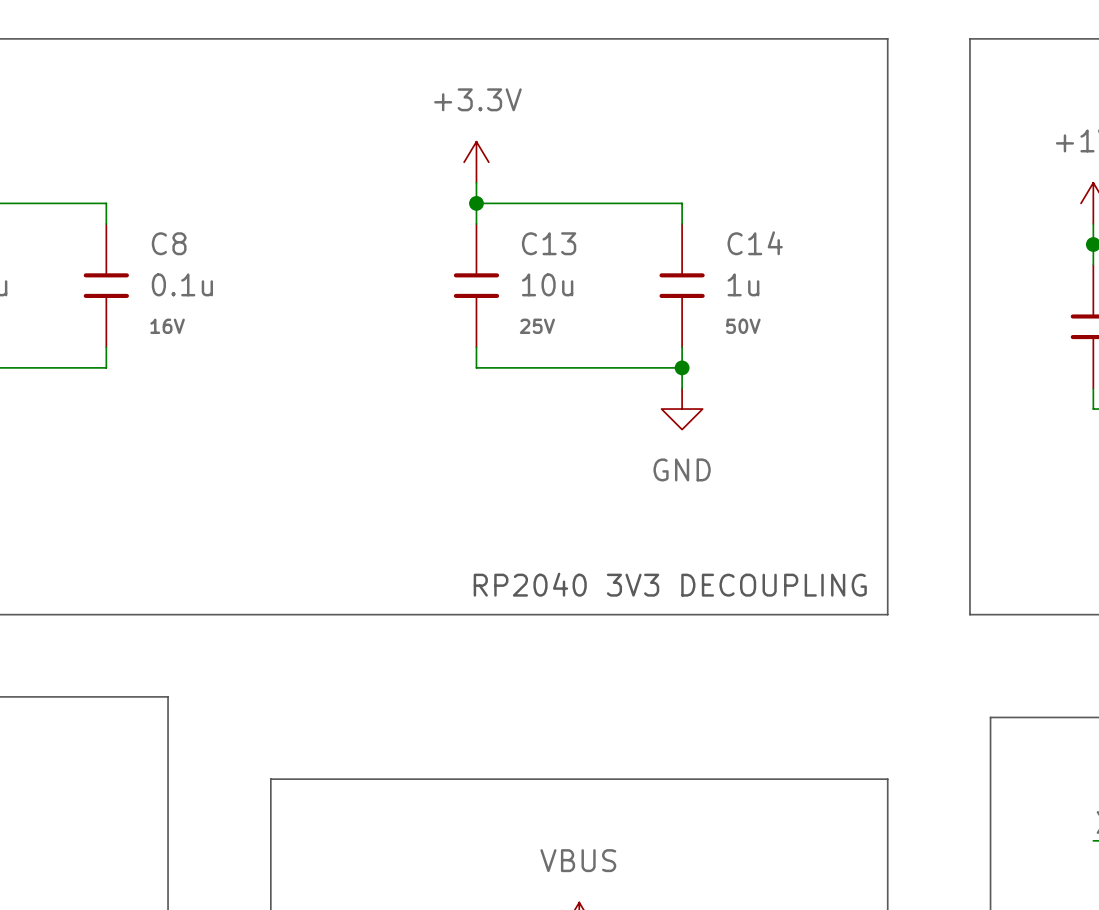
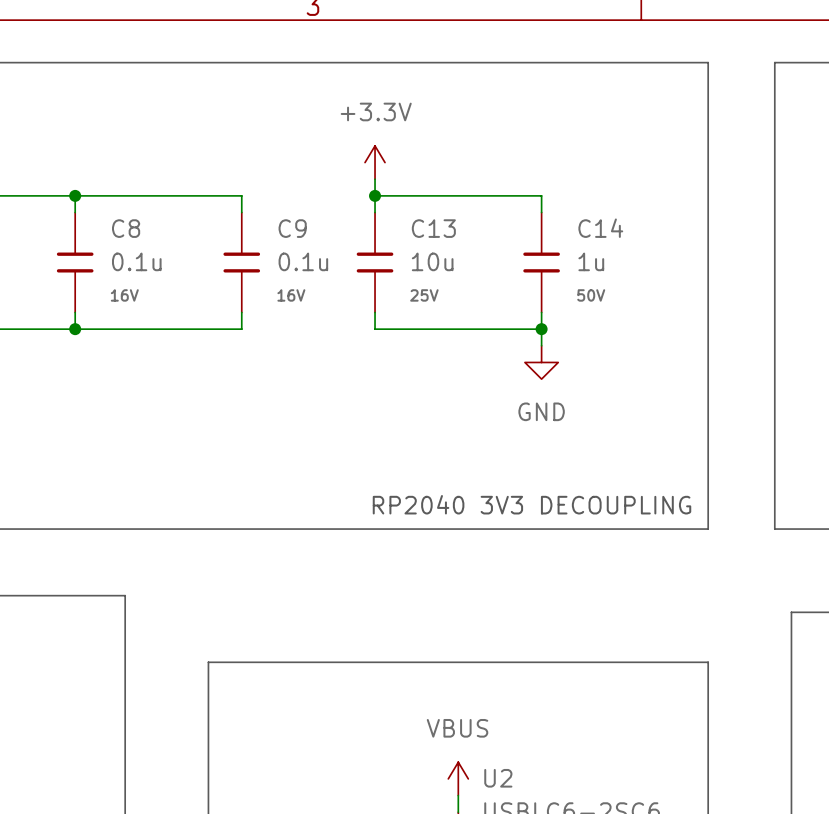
wire: none -> (75, 195) (241, 195) (241, 212)
junction: none -> (75, 195)
C9: none -> 0.1u (241, 262)
wire: none -> (241, 312) (241, 329) (75, 329)
junction: none -> (75, 329)

